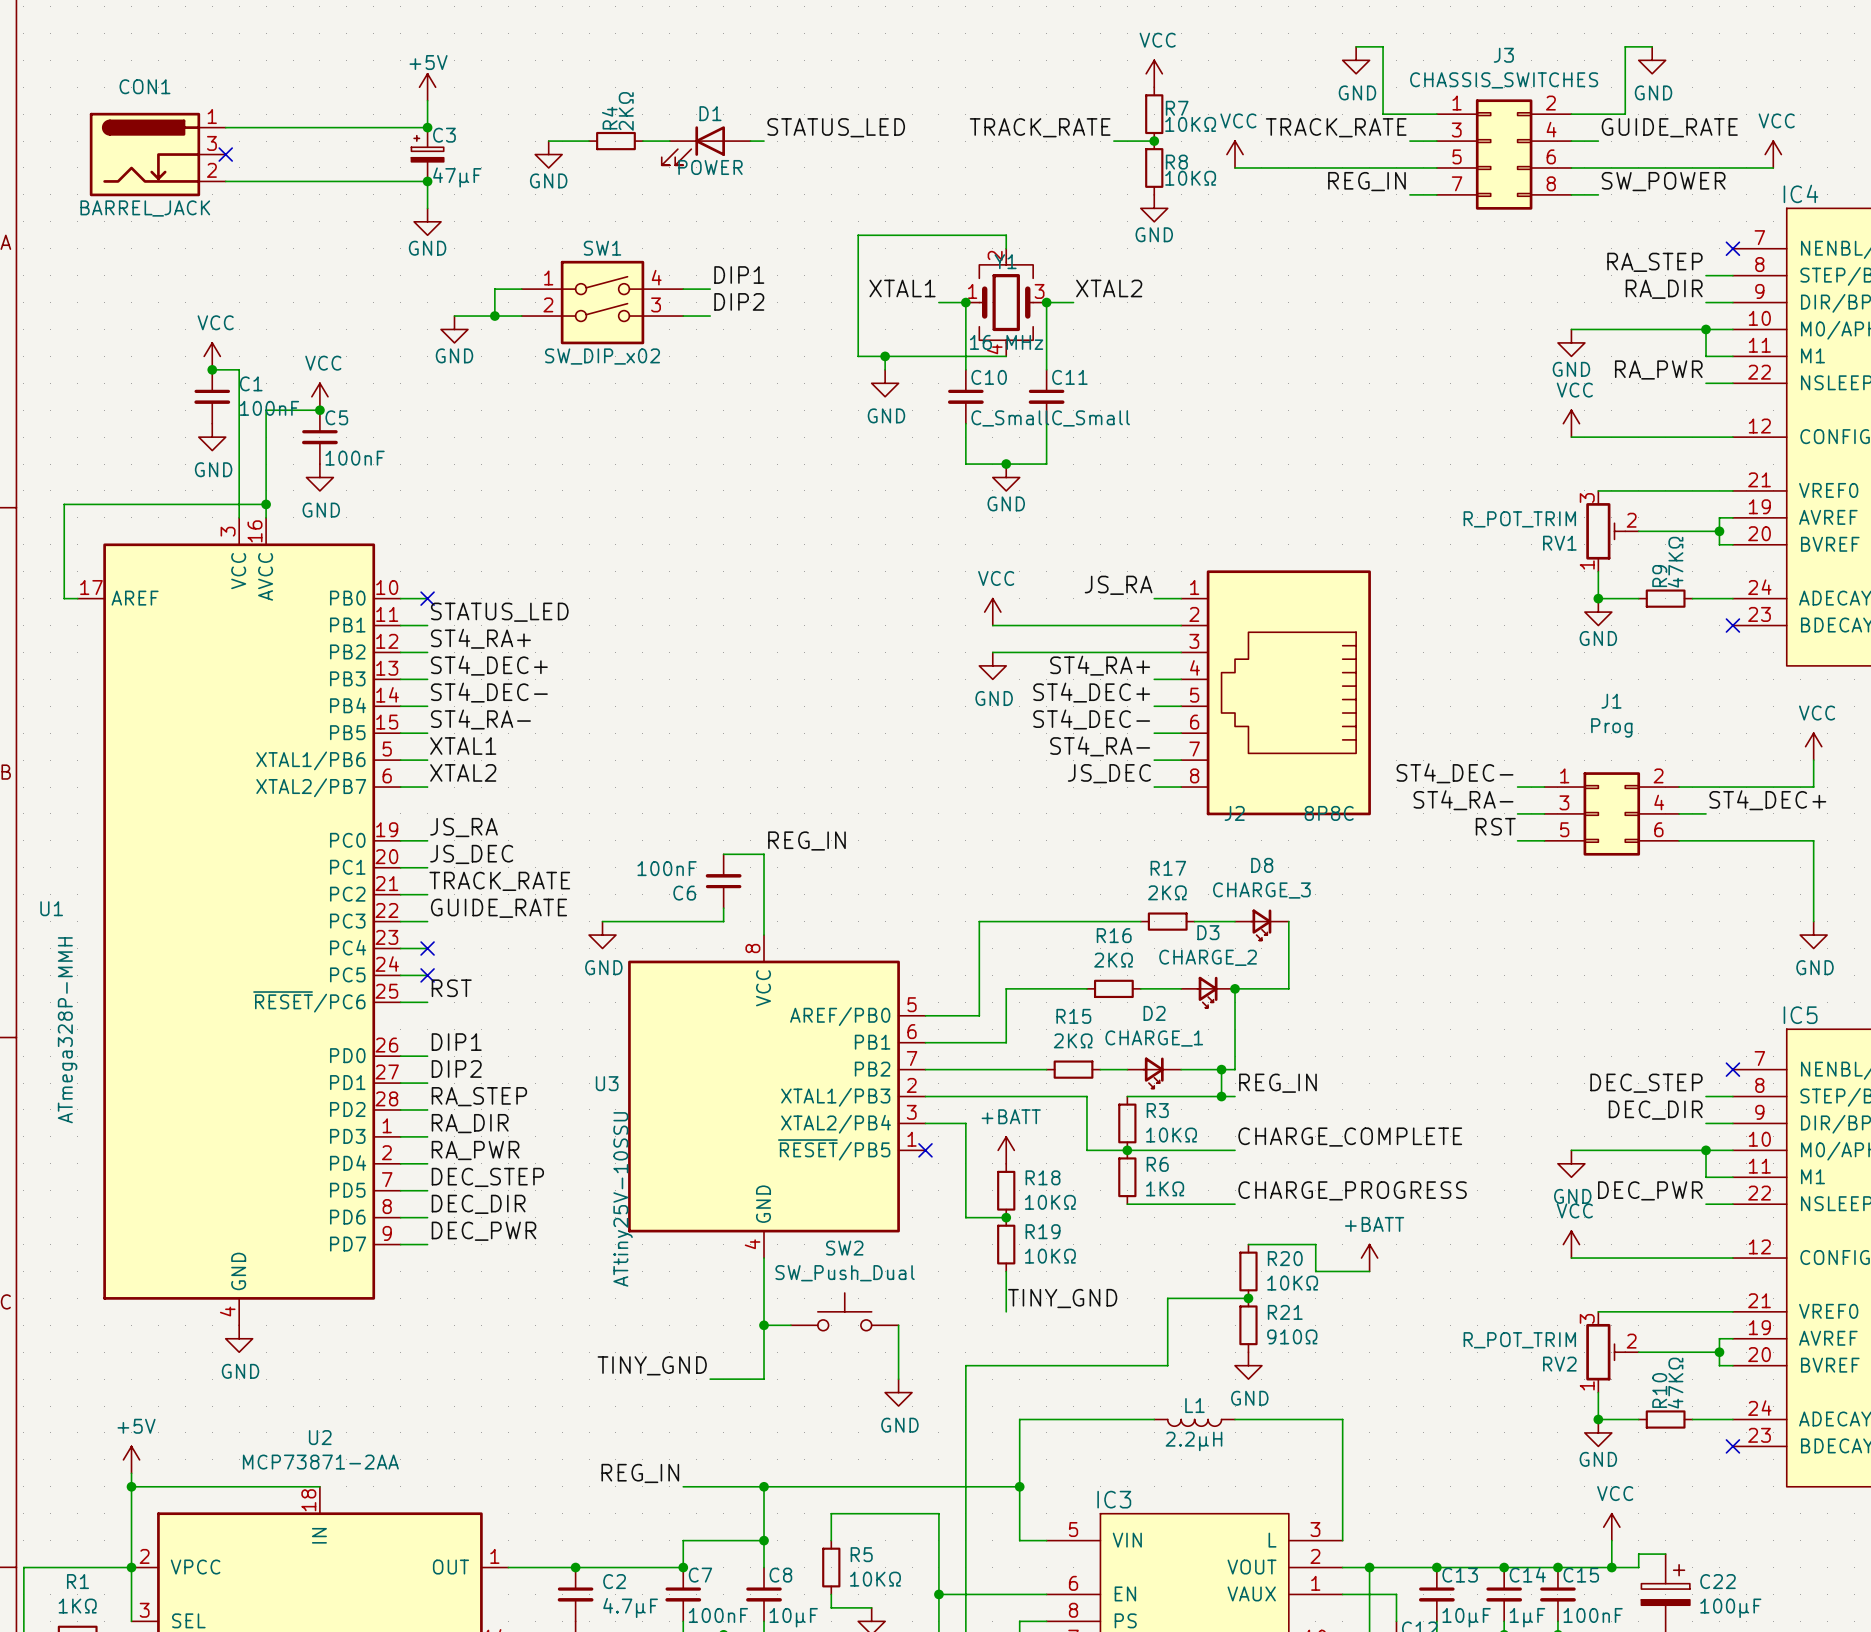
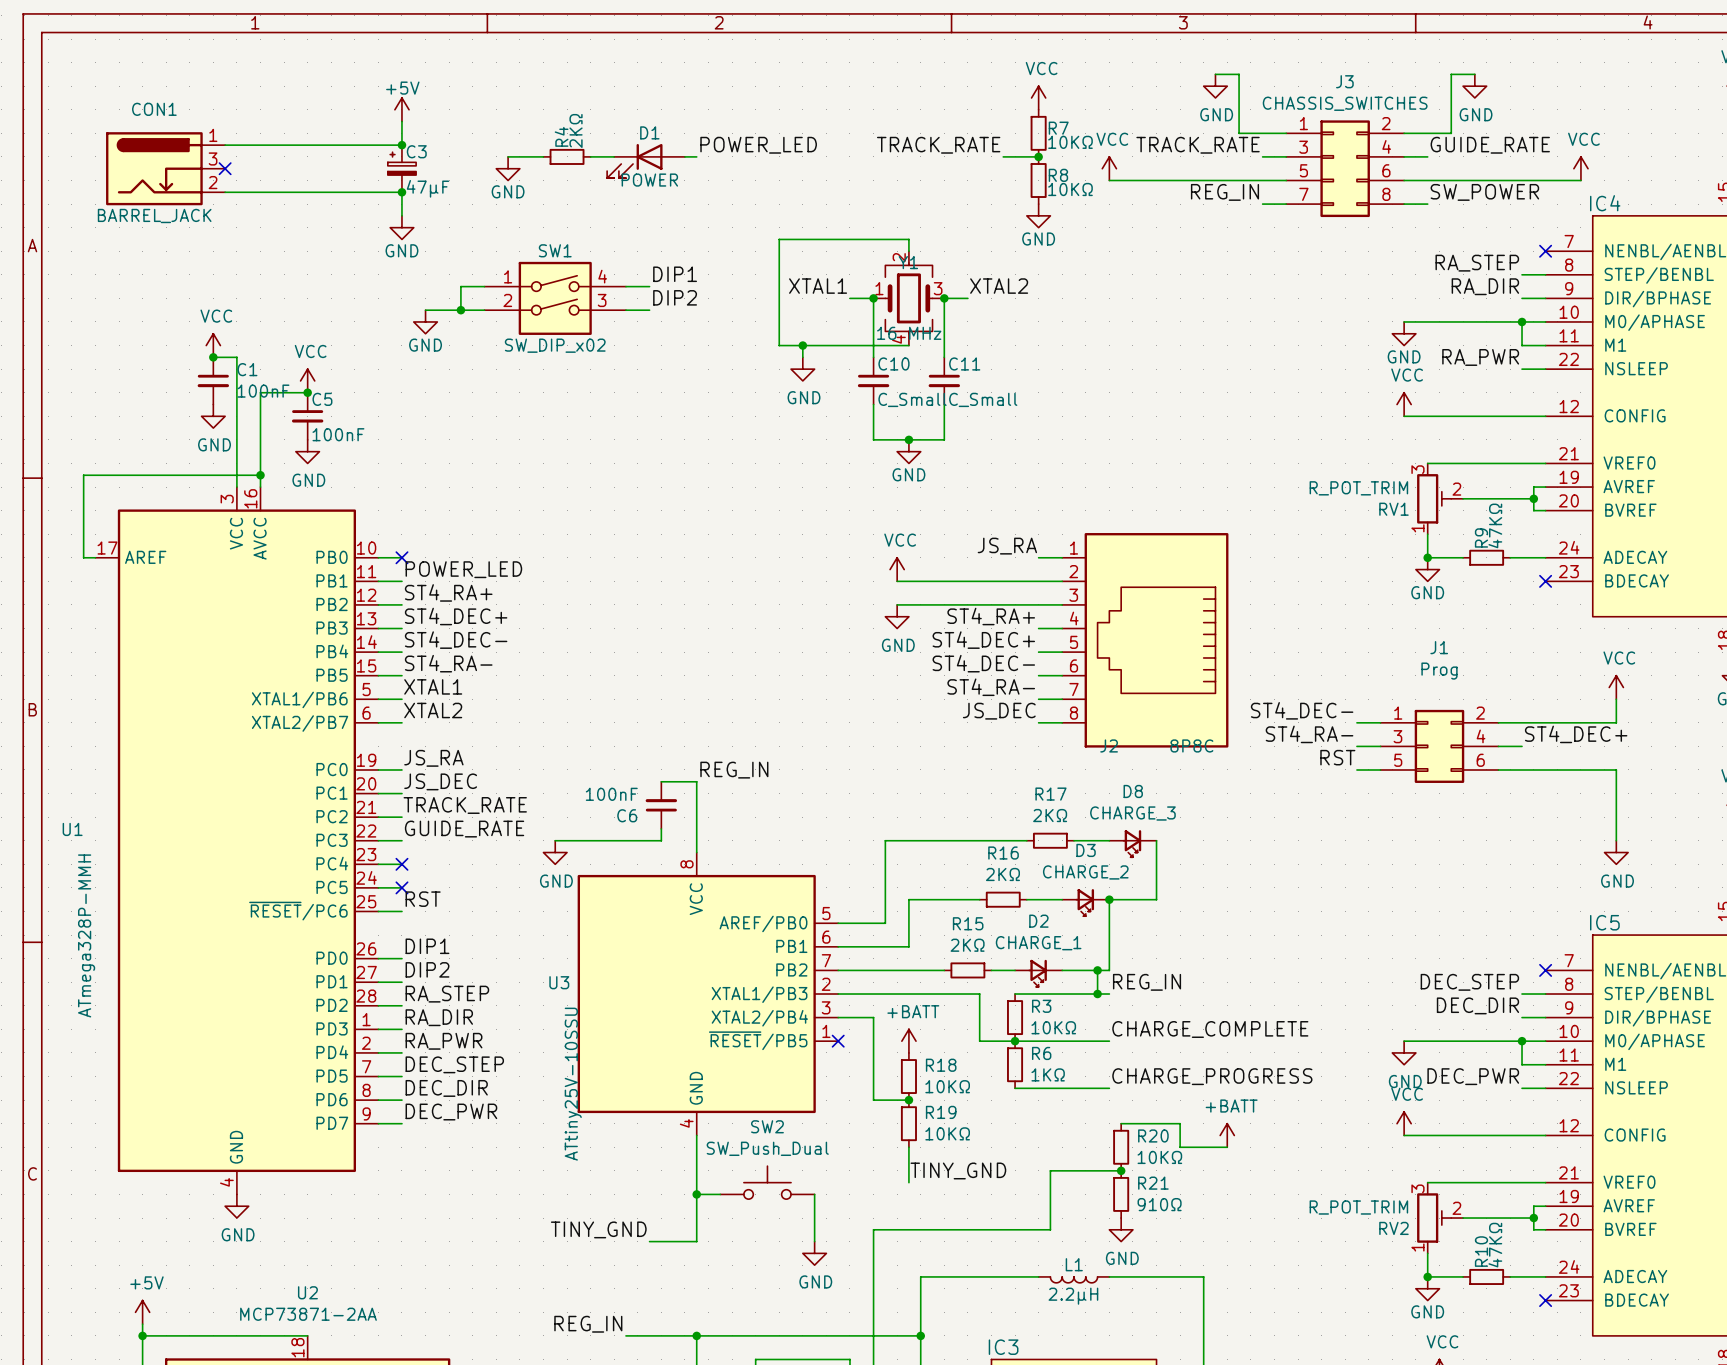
label: STATUS_LED (836, 127) -> POWER_LED (758, 145)
label: STATUS_LED (499, 612) -> POWER_LED (463, 569)

